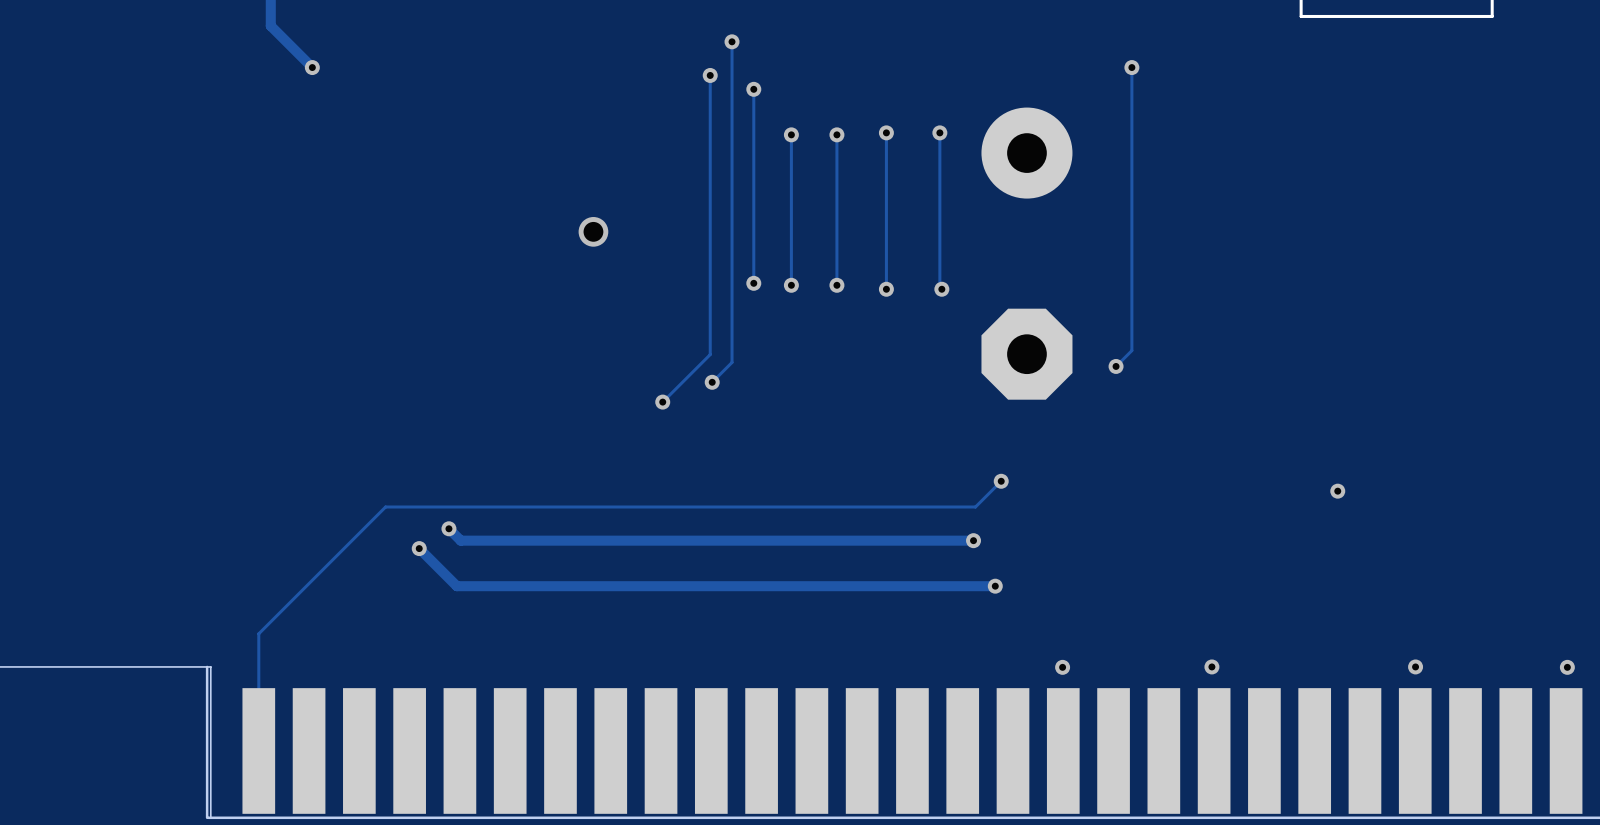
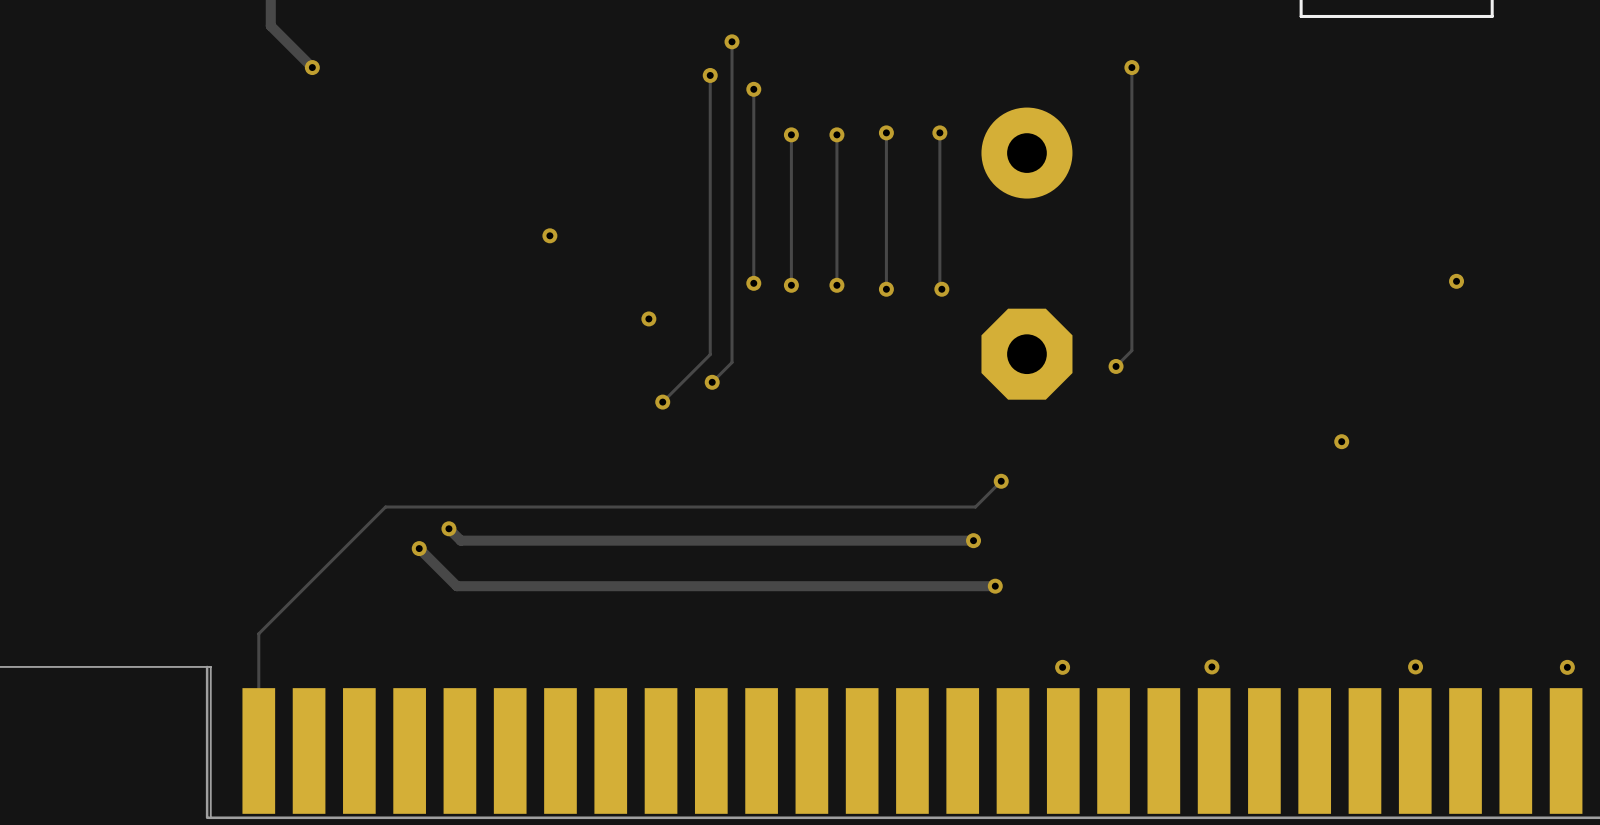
via: (593, 231) -> none
via: none -> (549, 235)
via: none -> (1456, 281)
via: none -> (648, 318)
via position: (1337, 491) -> (1341, 441)

